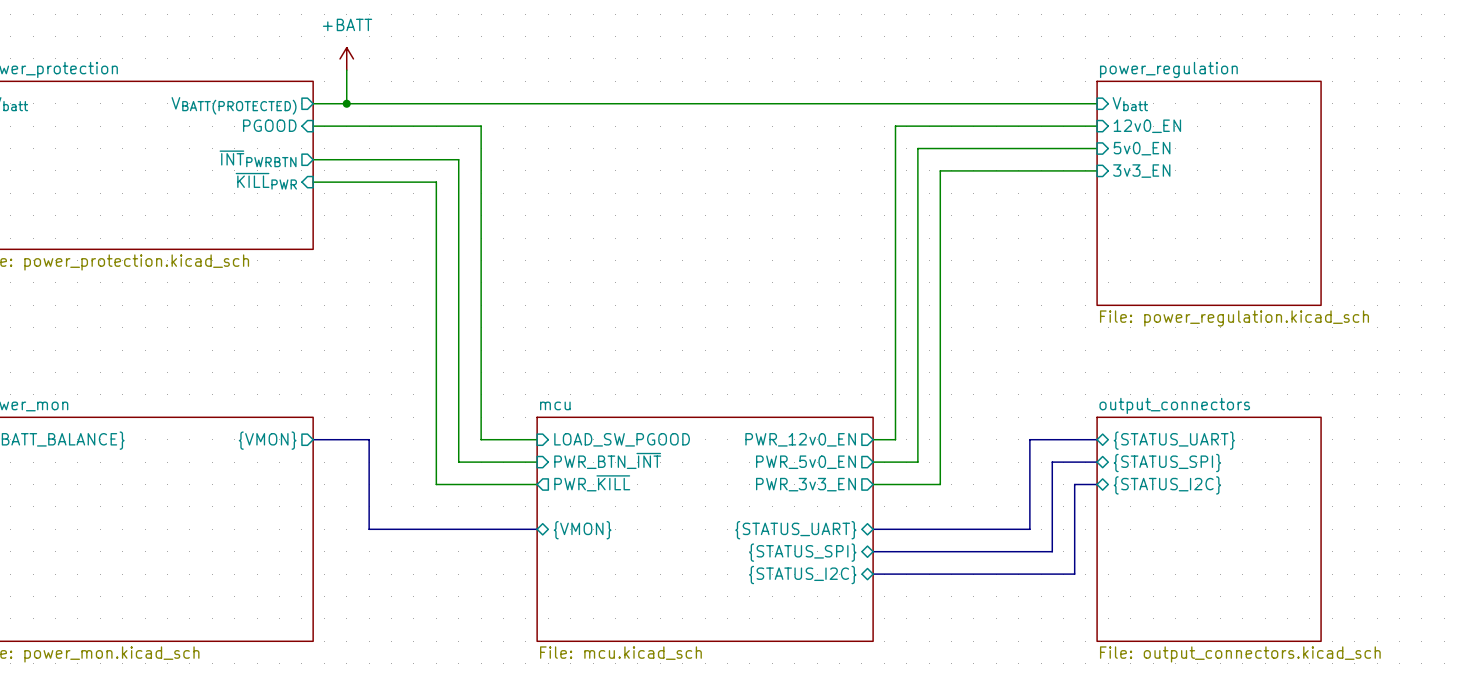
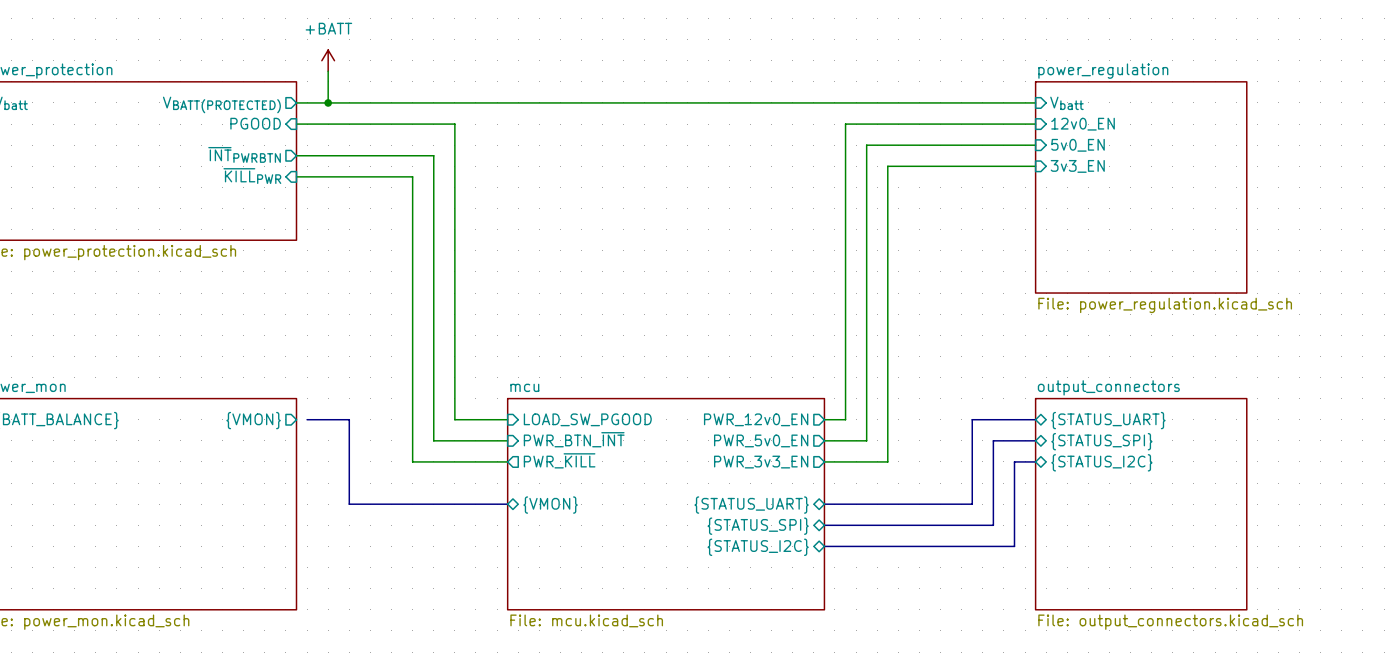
bus: (313, 439) (324, 439) -> none

